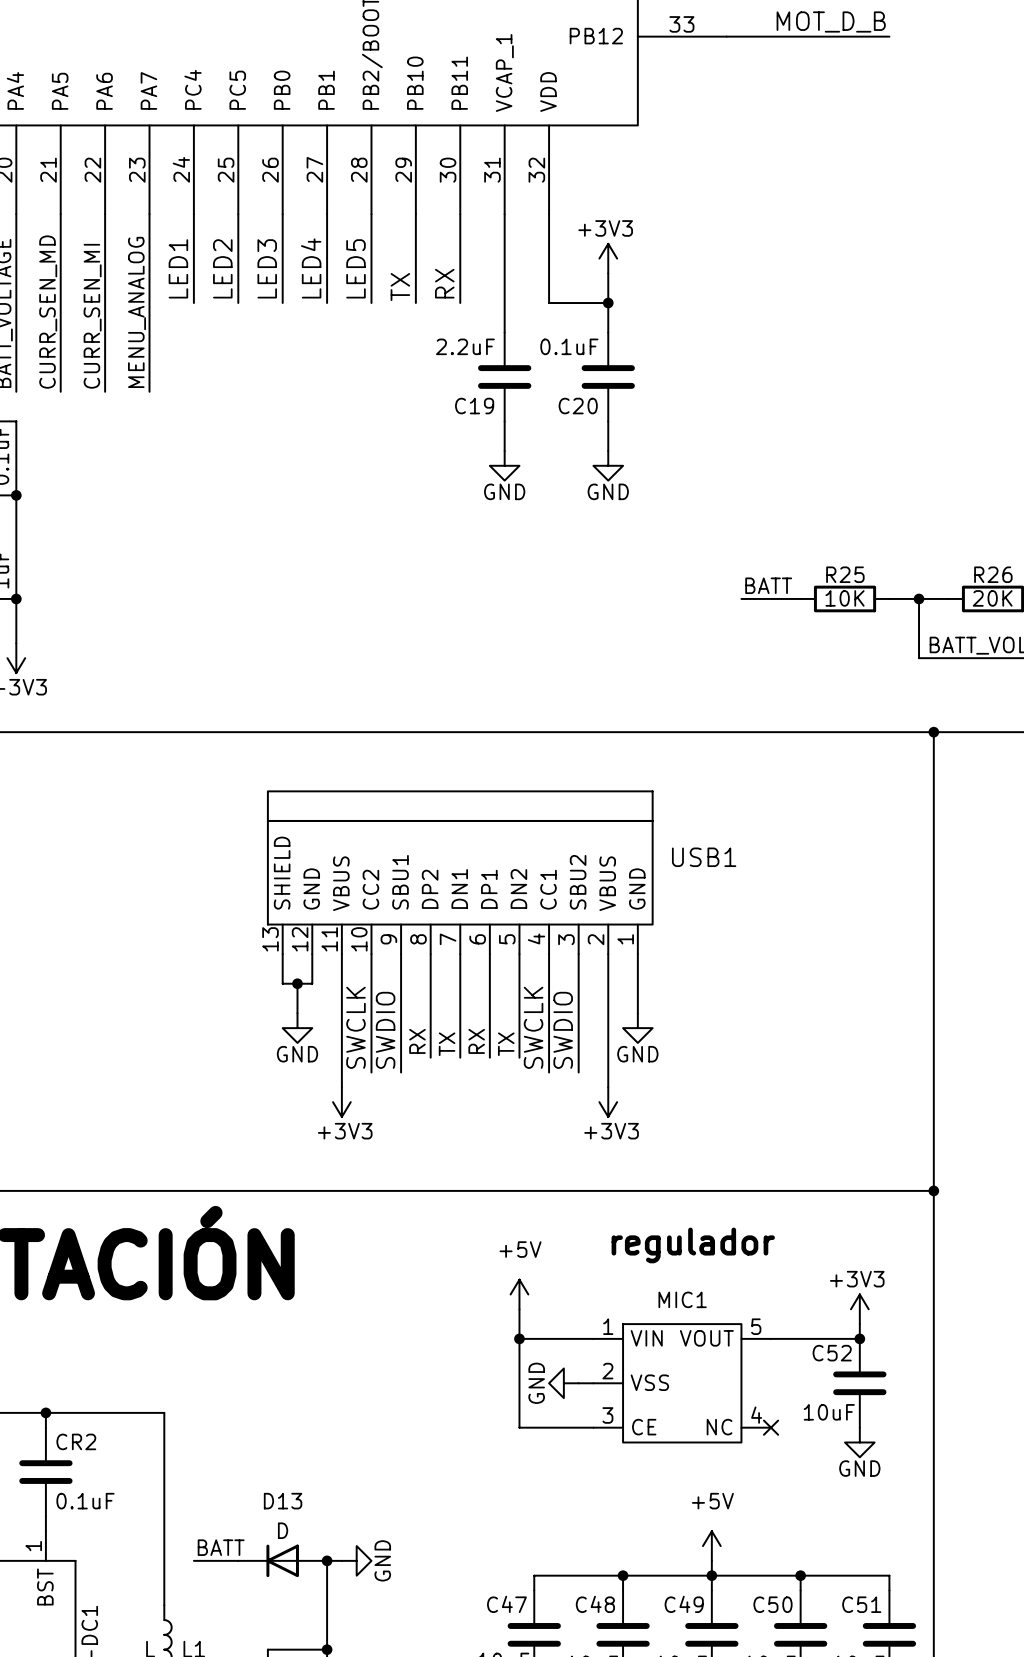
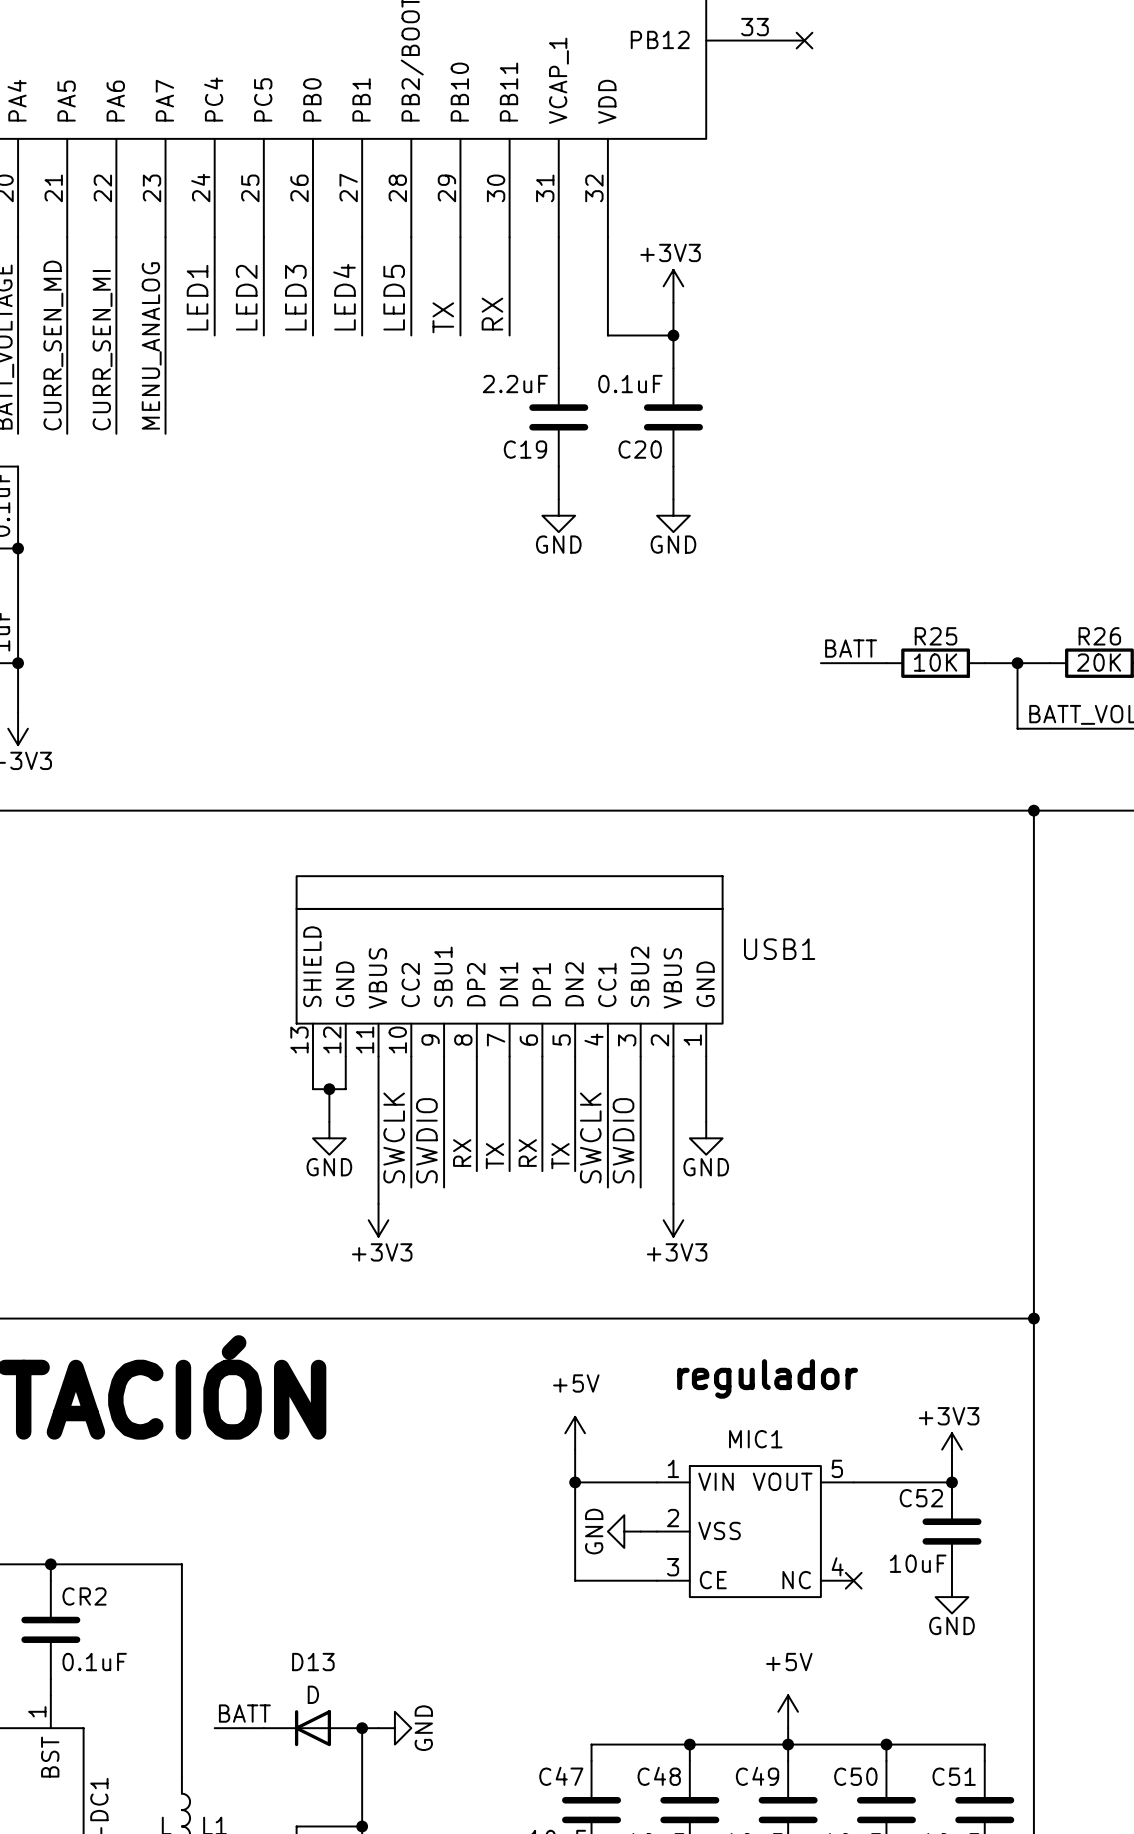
label: MOT_D_B (831, 21) -> none
wire: (726, 36) (889, 36) -> none
no-connect mark: none -> (804, 40)

